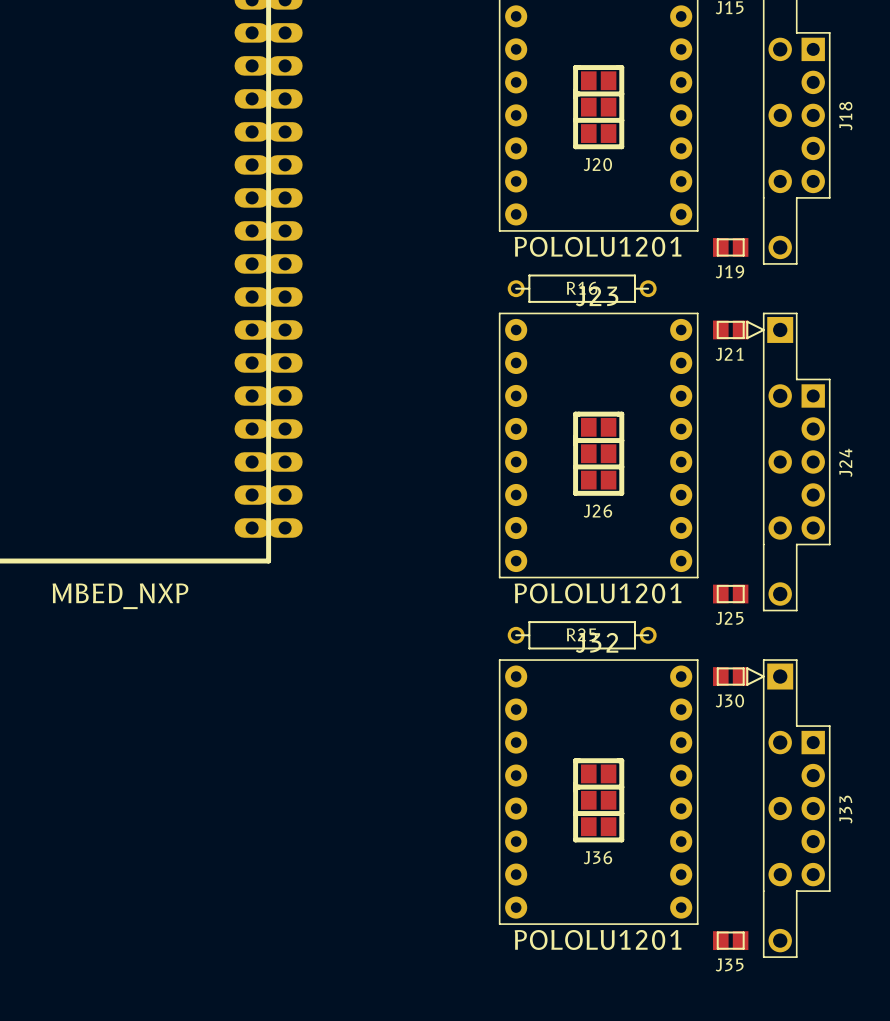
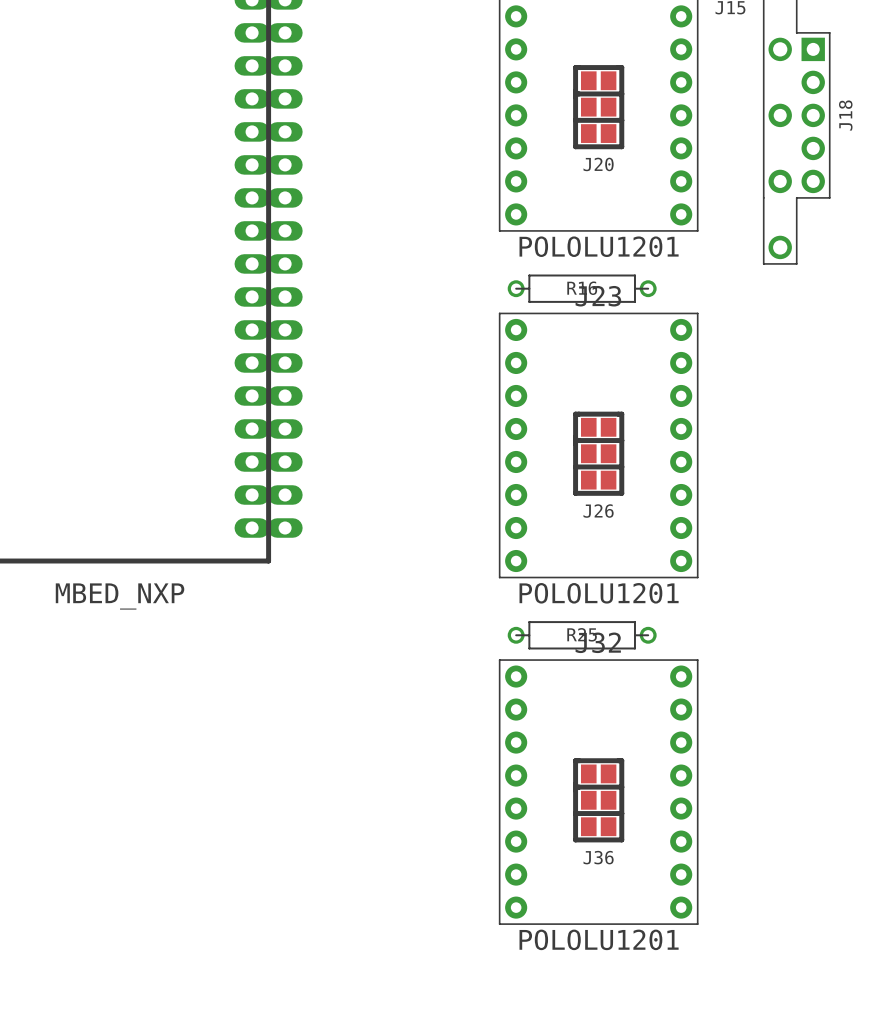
J19: (730, 247) -> none
J21: (730, 329) -> none
J24: (788, 461) -> none
J25: (730, 594) -> none
J30: (730, 676) -> none
J33: (788, 808) -> none
J35: (730, 940) -> none

